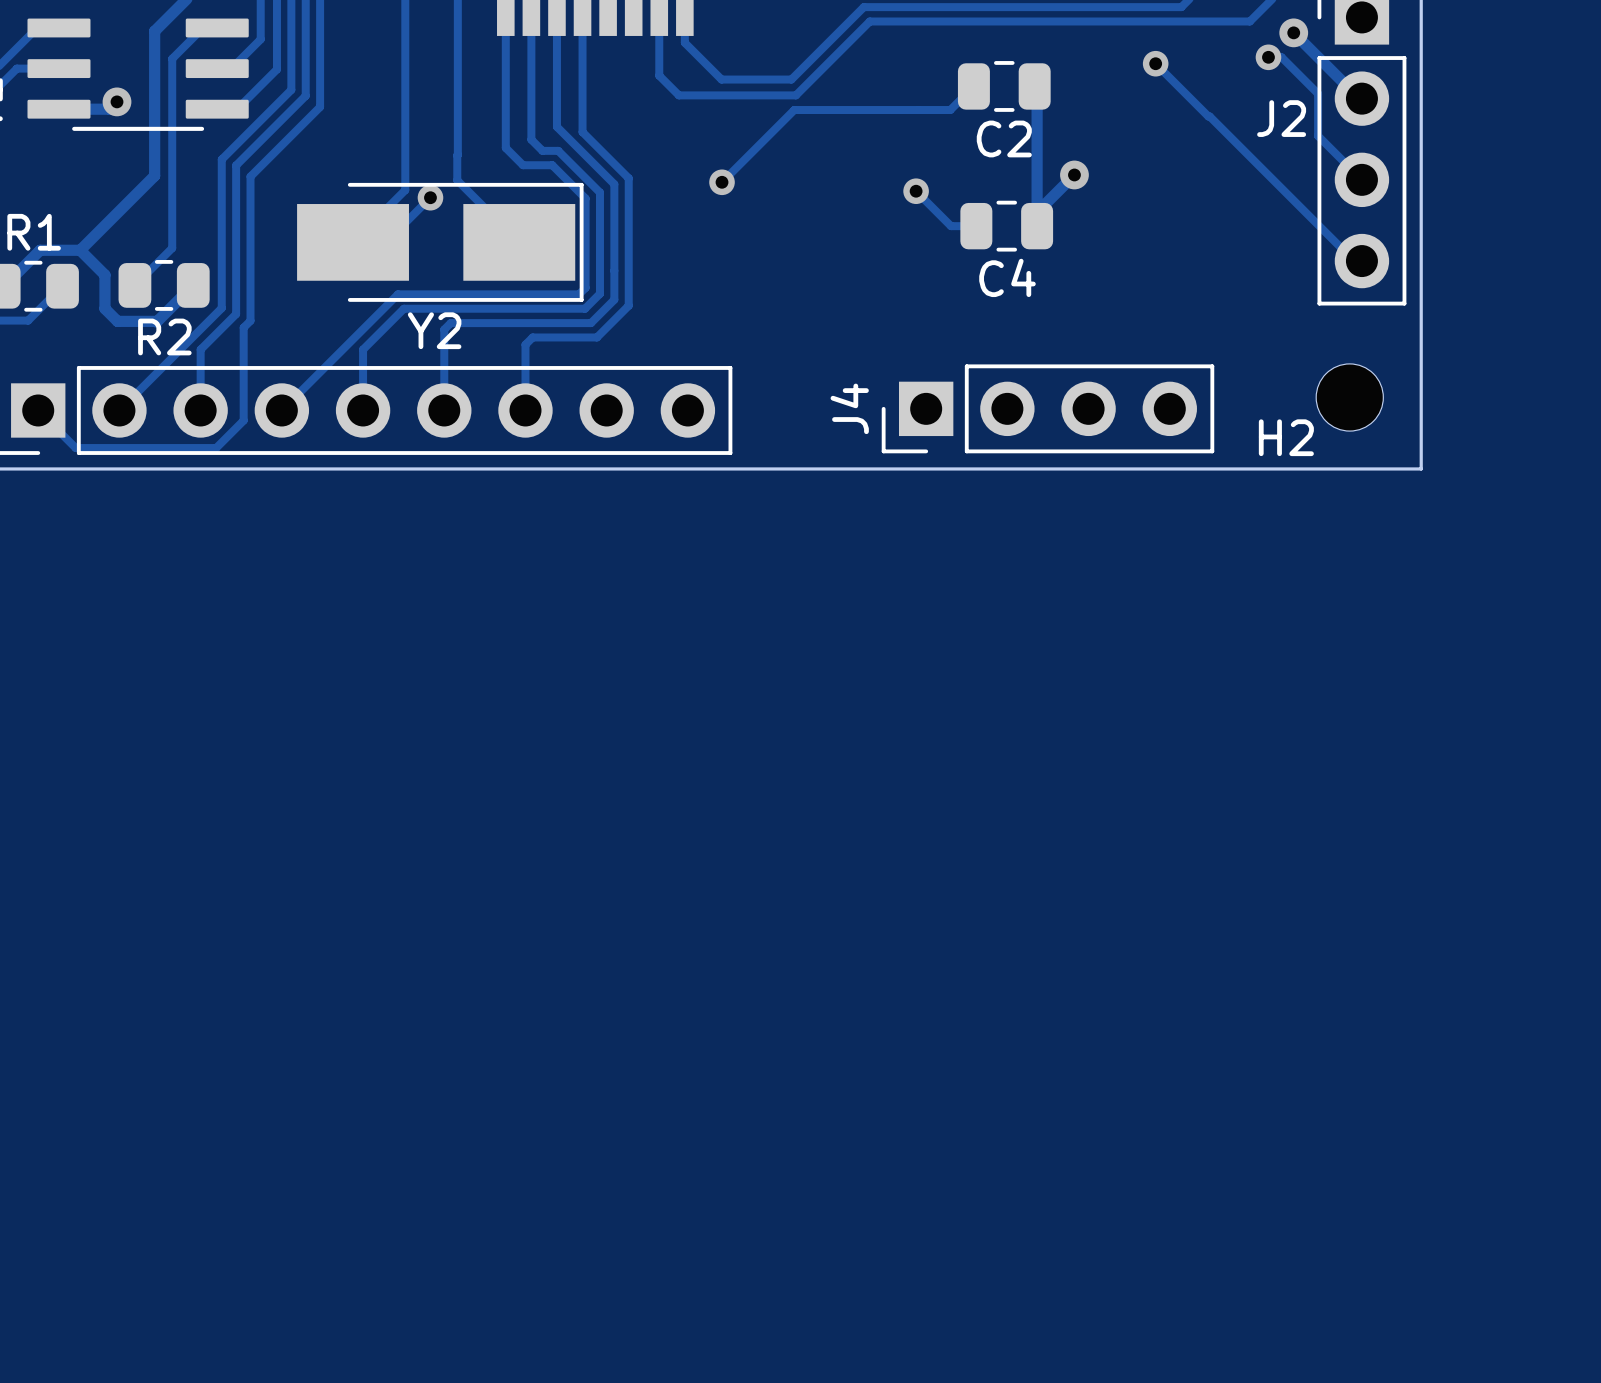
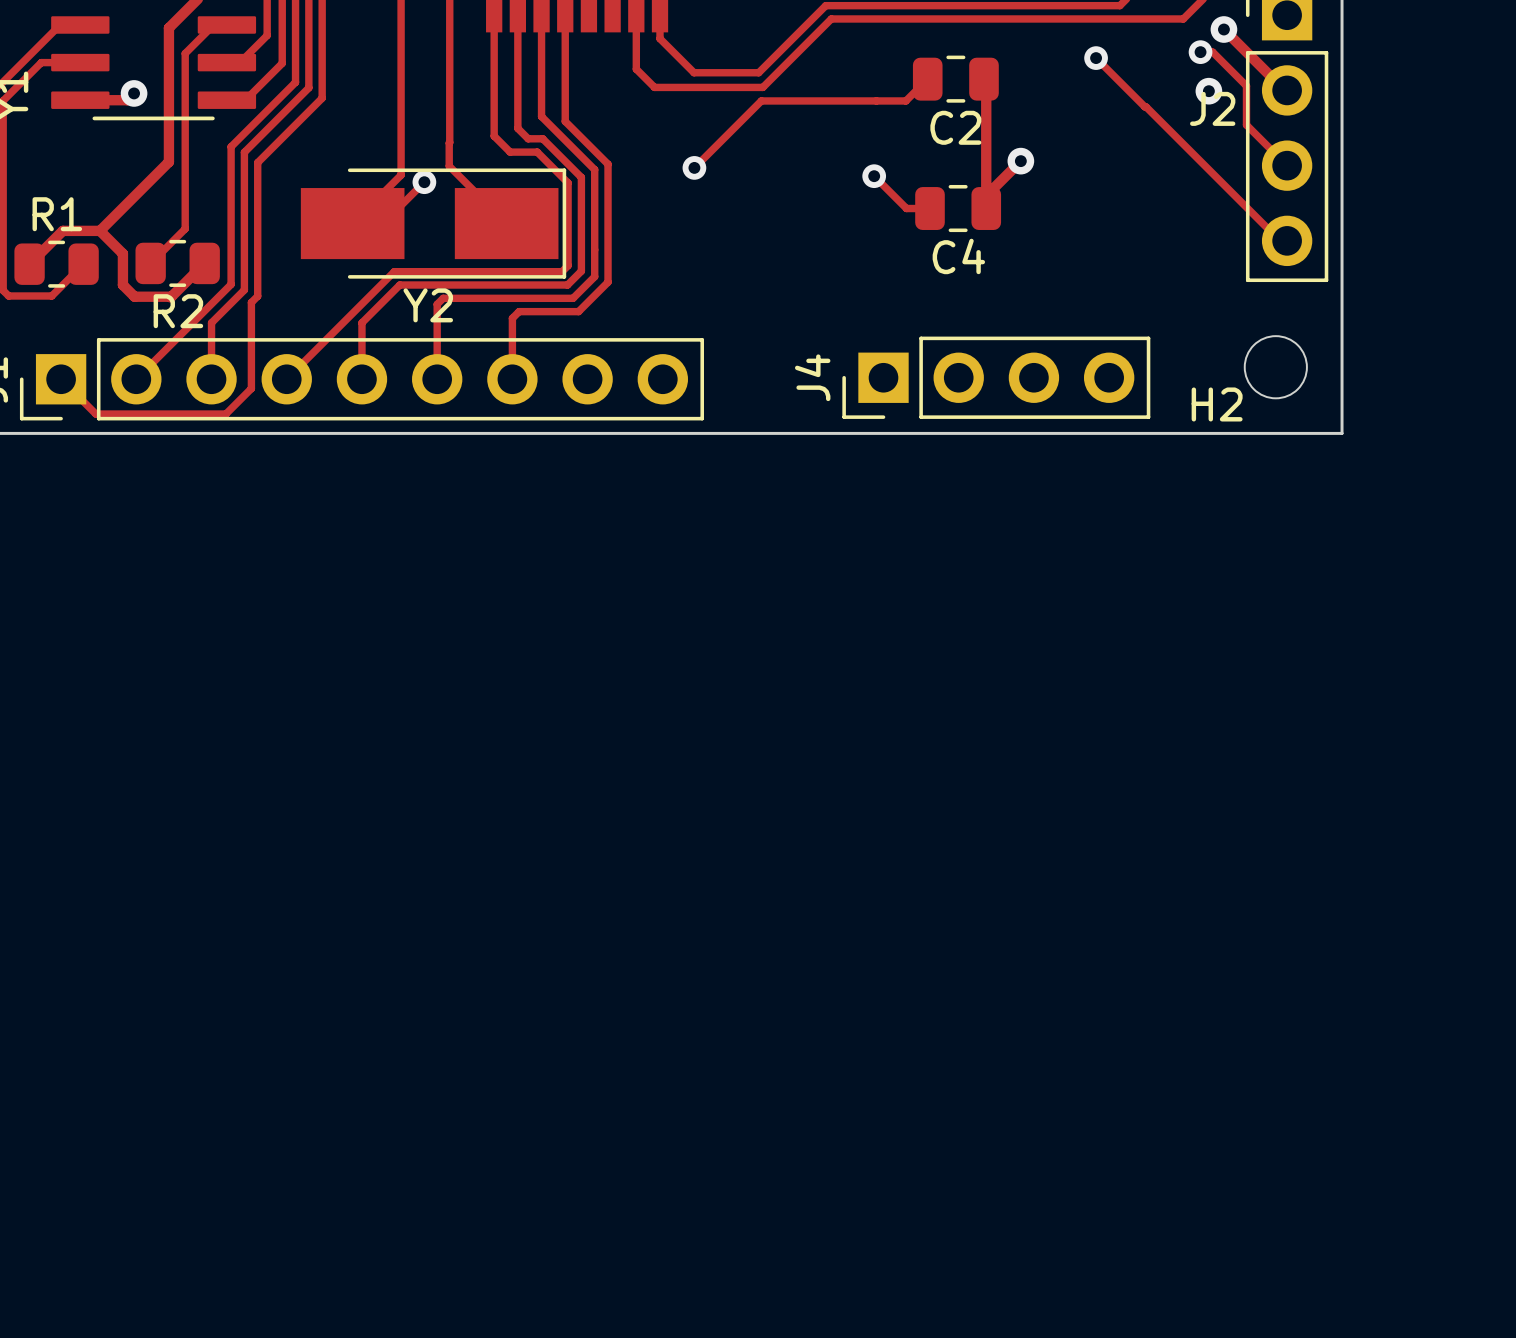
via: none -> (1208, 91)

